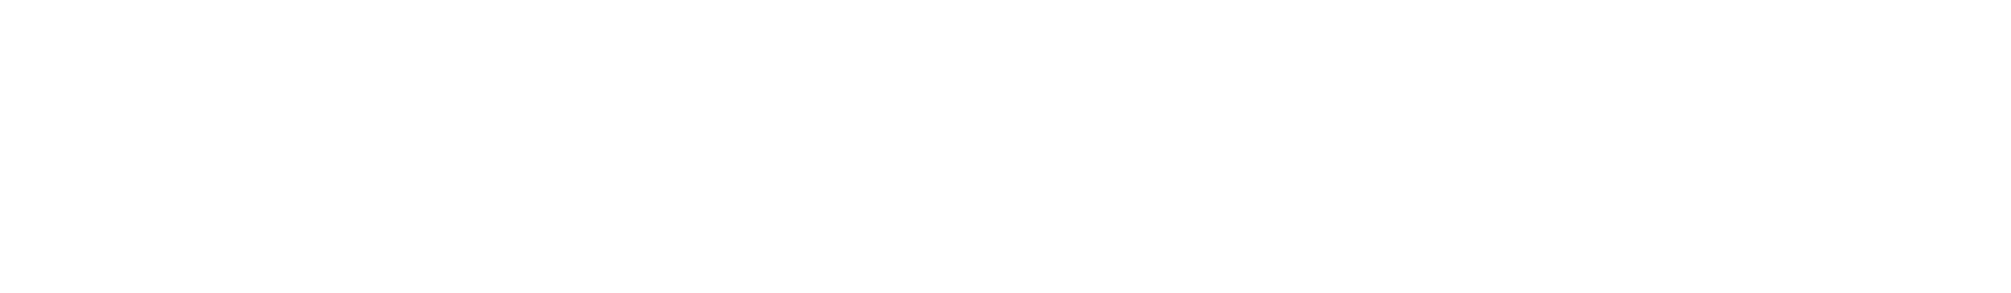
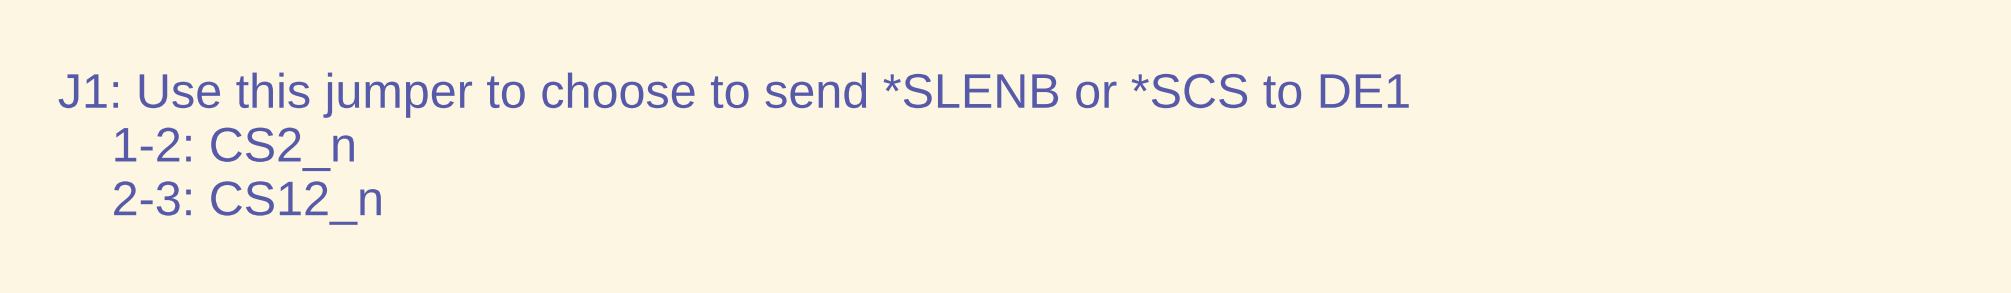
text: none -> J1: Use this jumper to choose to send *SLENB or *SCS to DE1 (733, 95)
text: none -> 1-2: CS2_n (234, 149)
text: none -> 2-3: CS12_n (247, 203)

